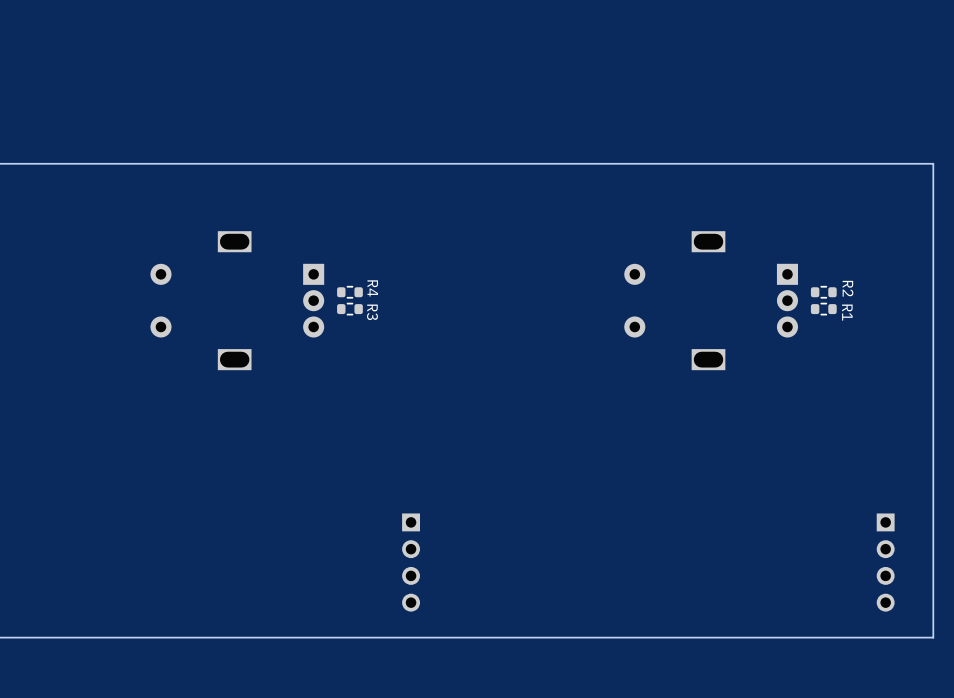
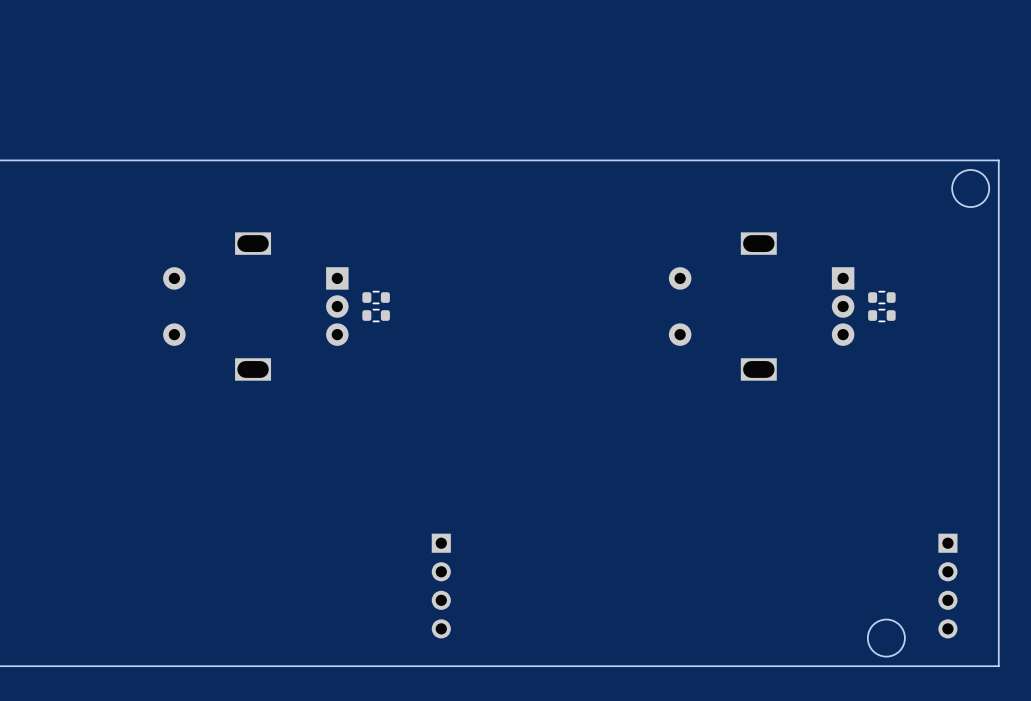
round board edge: none -> [951, 169, 990, 208]
R4 name: R4 (372, 288) -> none
R2 name: R2 (847, 288) -> none
R3 name: R3 (372, 312) -> none
R1 name: R1 (847, 312) -> none
round board edge: none -> [867, 619, 906, 657]

